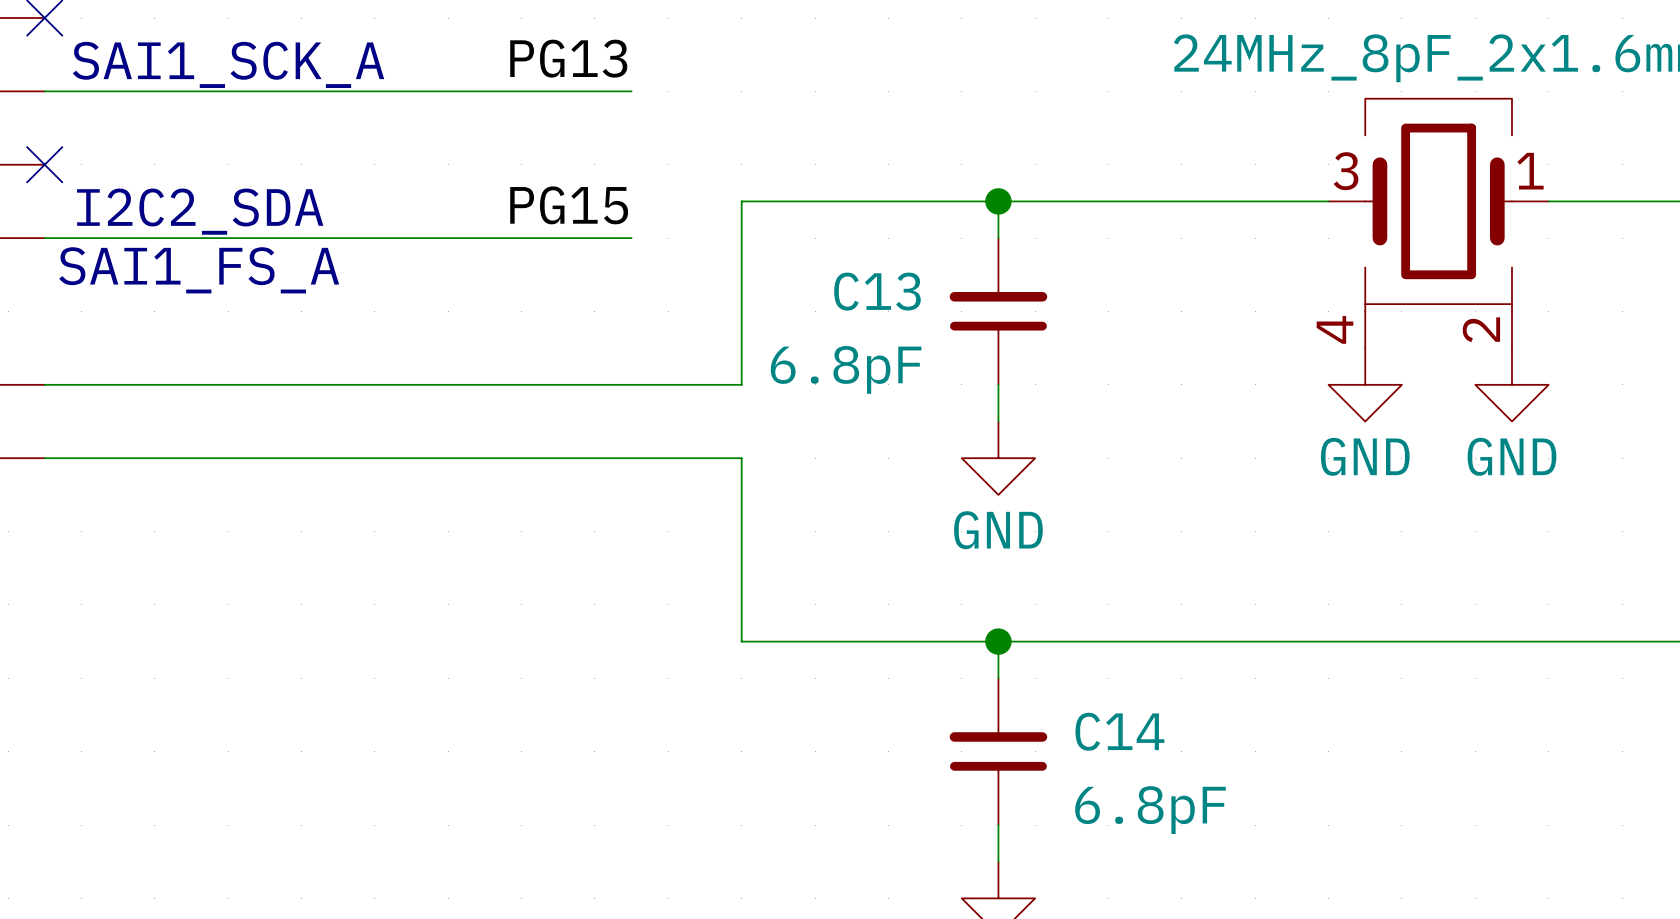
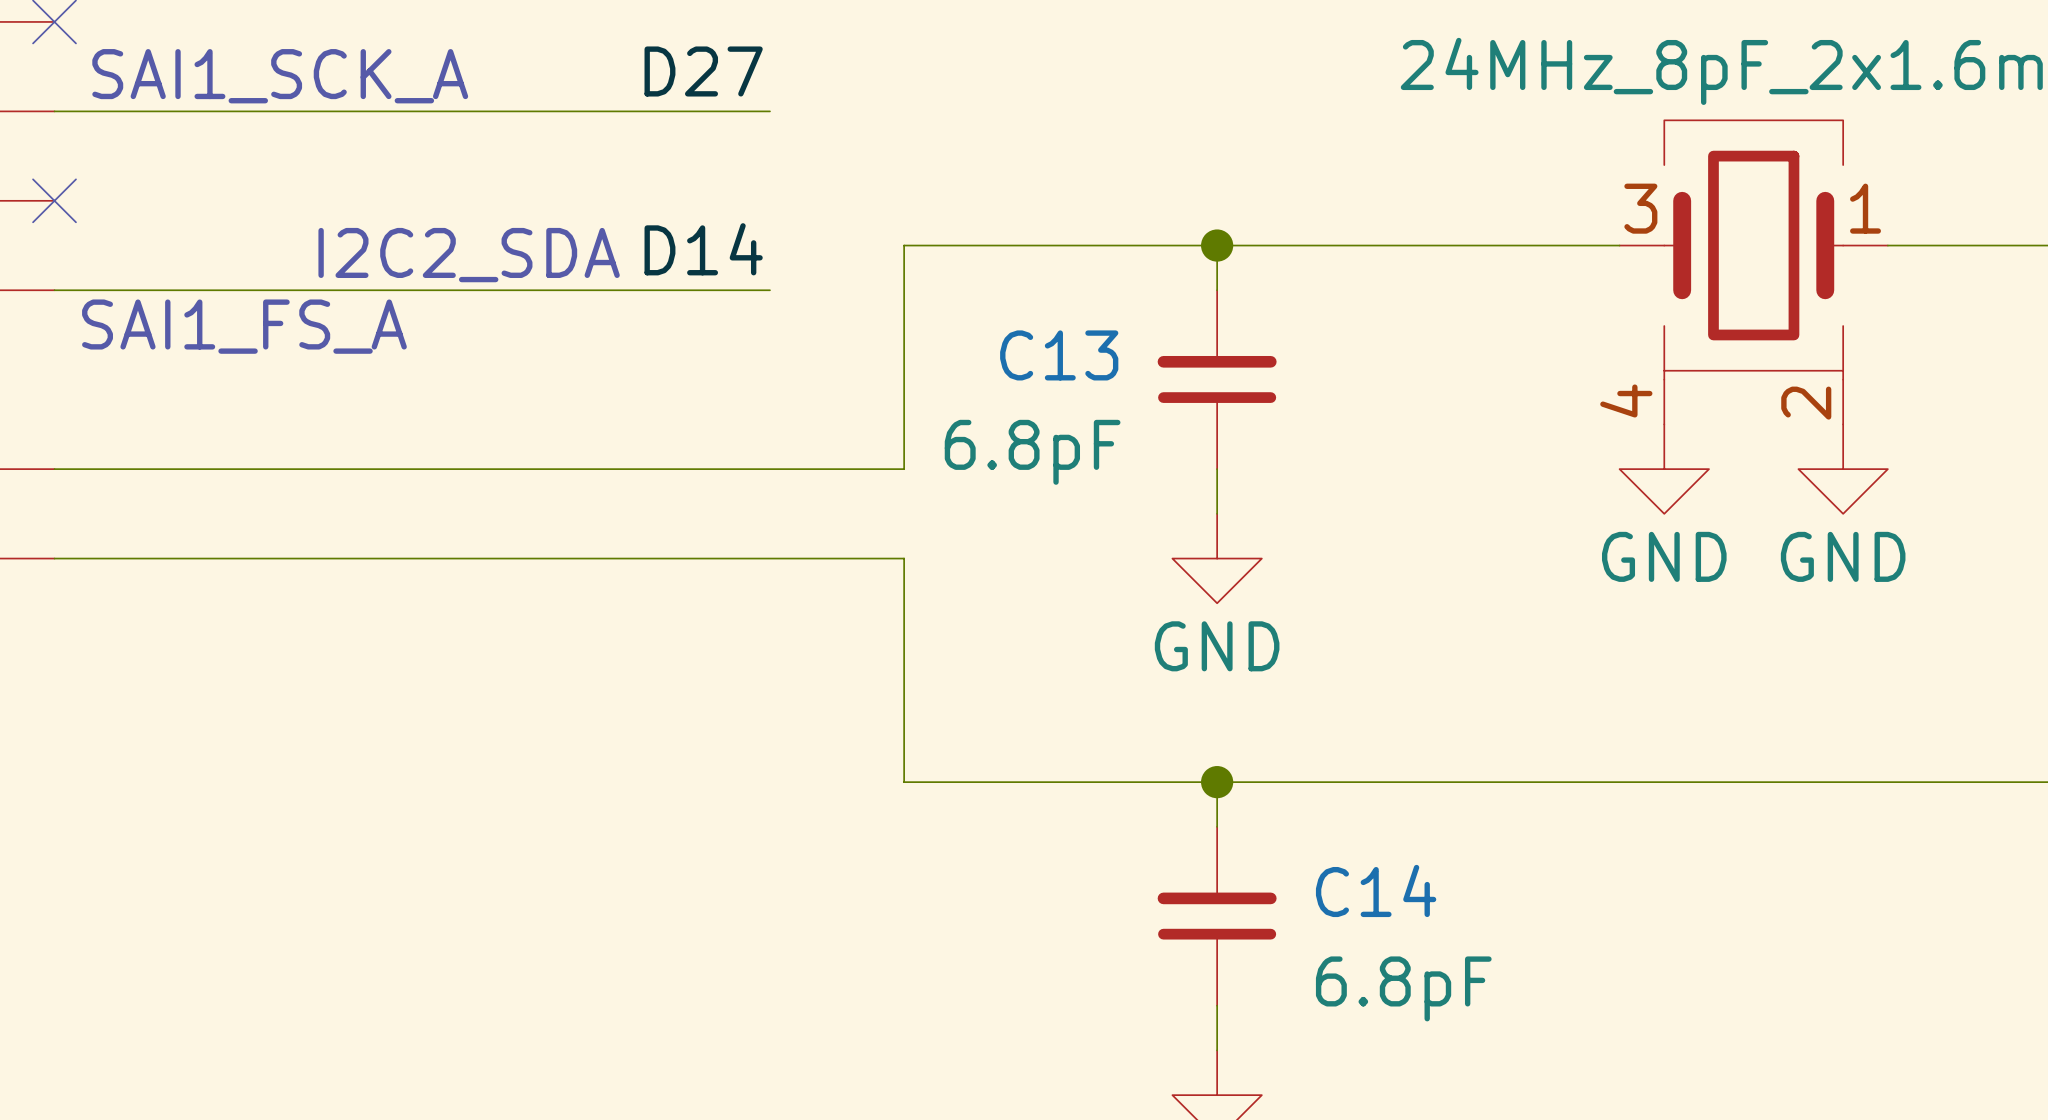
label: PG13 (568, 58) -> D27 (703, 71)
label: PG15 (569, 205) -> D14 (703, 249)
text position: I2C2_SDA (200, 211) -> I2C2_SDA (469, 255)

